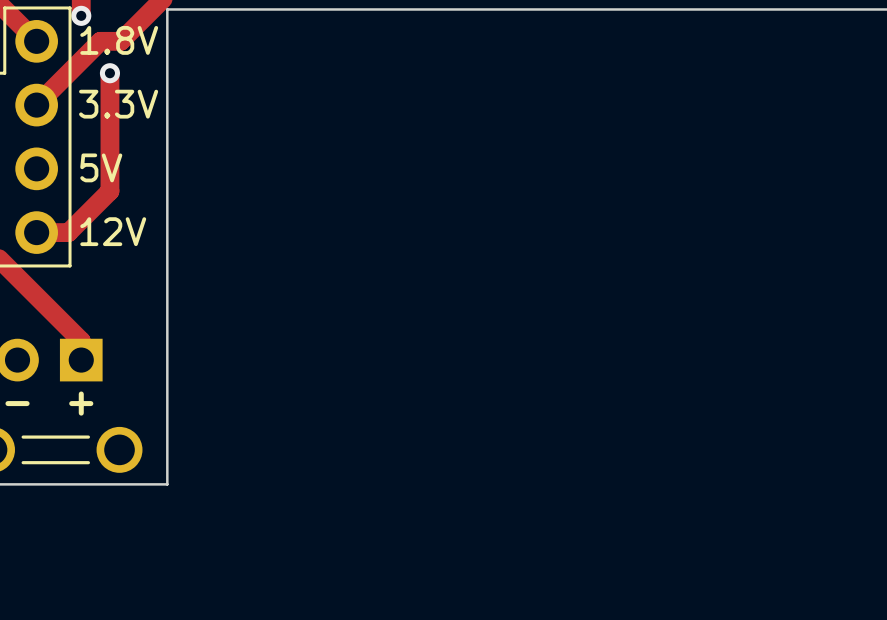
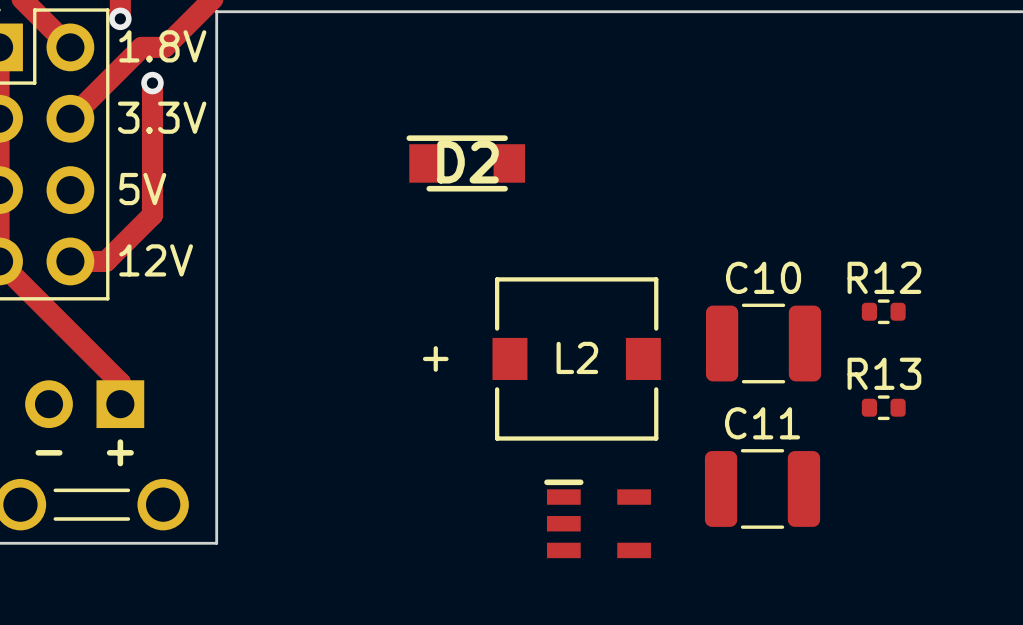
D2: none -> (465, 163)
R12: none -> (883, 311)
C10: none -> (763, 343)
L2: none -> (541, 358)
R13: none -> (883, 407)
C11: none -> (762, 488)
part: none -> (597, 518)

